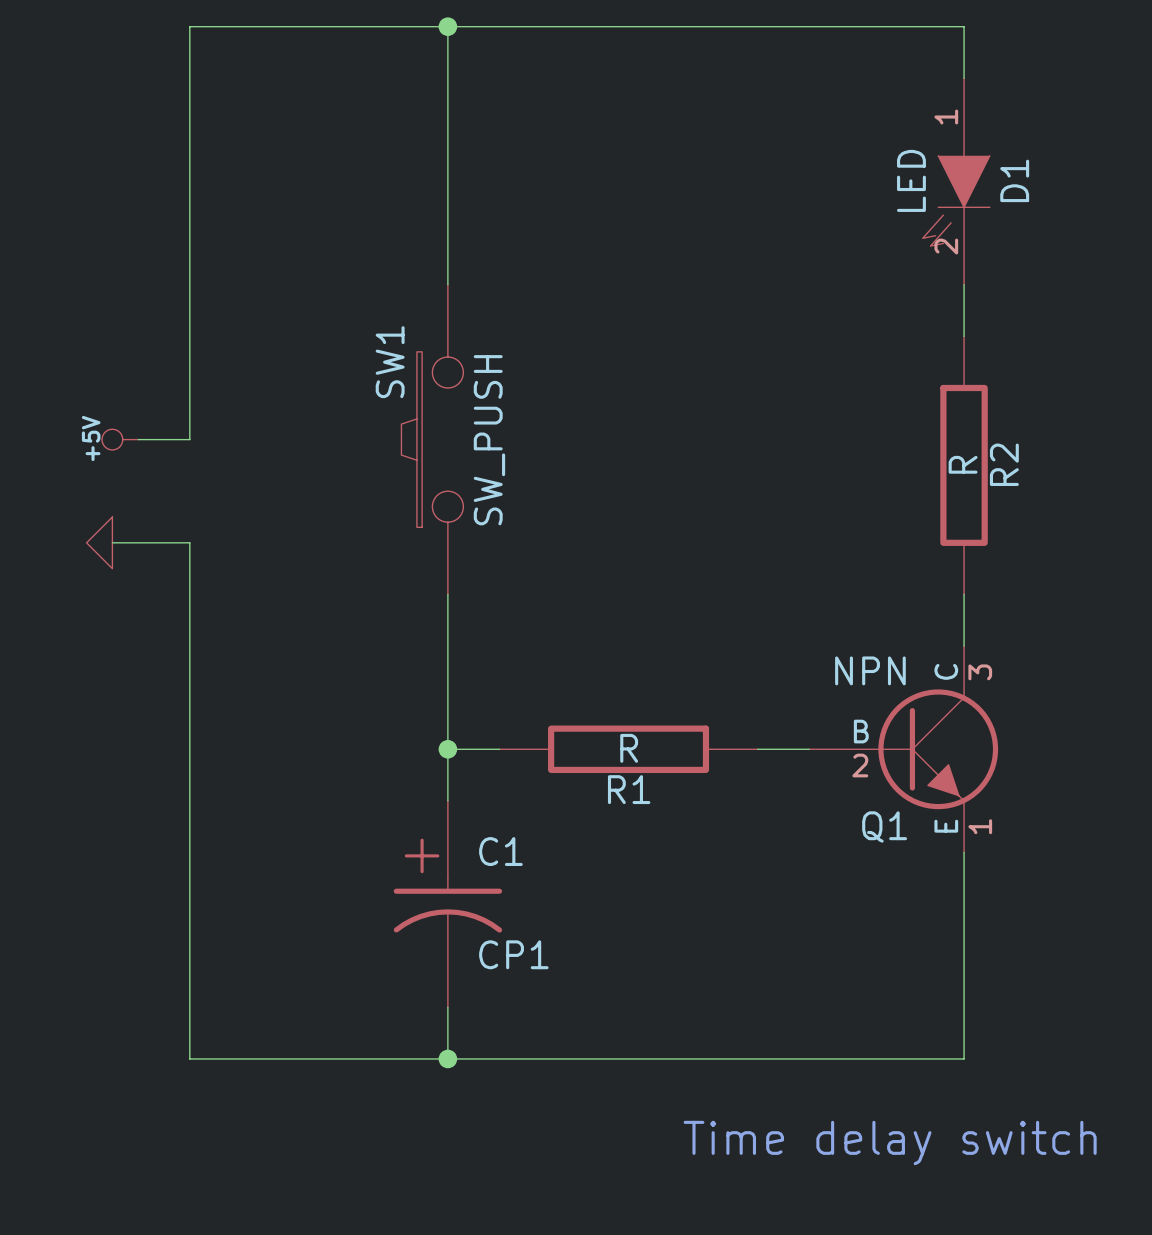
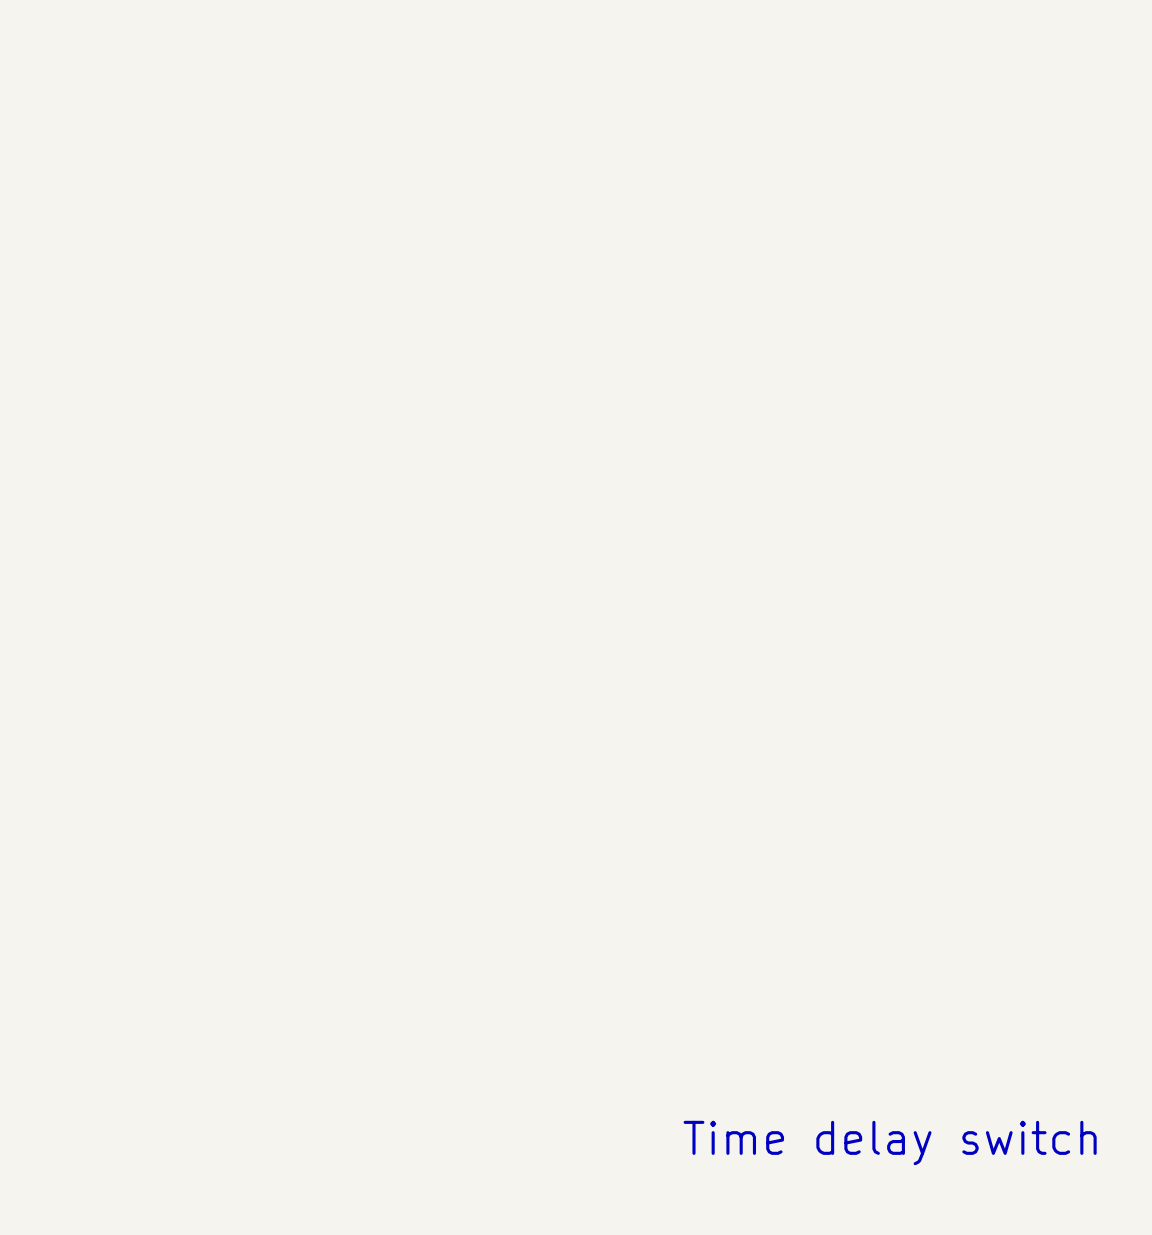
wire: (447, 26) (447, 284) -> none
junction: (447, 26) -> none
wire: (964, 78) (964, 26) (189, 26) (189, 439) (138, 439) -> none
D1: LED (956, 181) -> none
wire: (964, 284) (964, 336) -> none
power symbol: +5V (120, 439) -> none
SW1: SW_PUSH (432, 439) -> none
R2: R (964, 465) -> none
power symbol: (99, 542) -> none
wire: (112, 542) (189, 542) (189, 1058) (964, 1058) (964, 852) -> none
wire: (447, 594) (447, 800) -> none
wire: (964, 594) (964, 646) -> none
wire: (447, 749) (499, 749) -> none
junction: (447, 749) -> none
R1: R (628, 749) -> none
wire: (757, 749) (809, 749) -> none
Q1: NPN (903, 749) -> none
C1: CP1 (447, 904) -> none
wire: (447, 1007) (447, 1058) -> none
junction: (447, 1058) -> none

